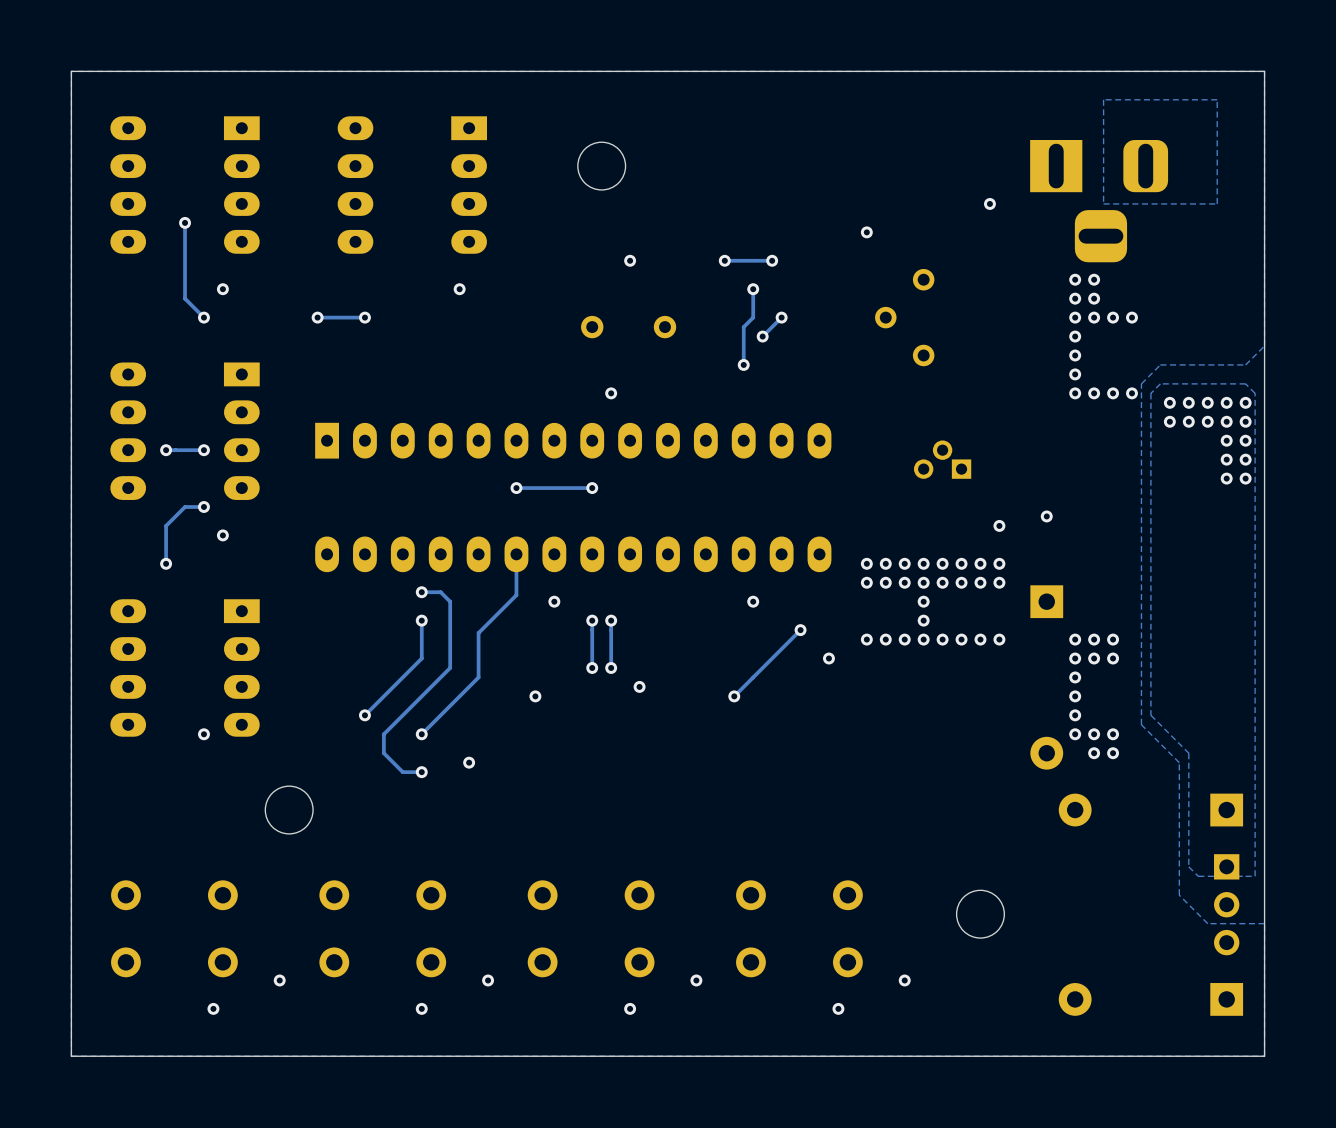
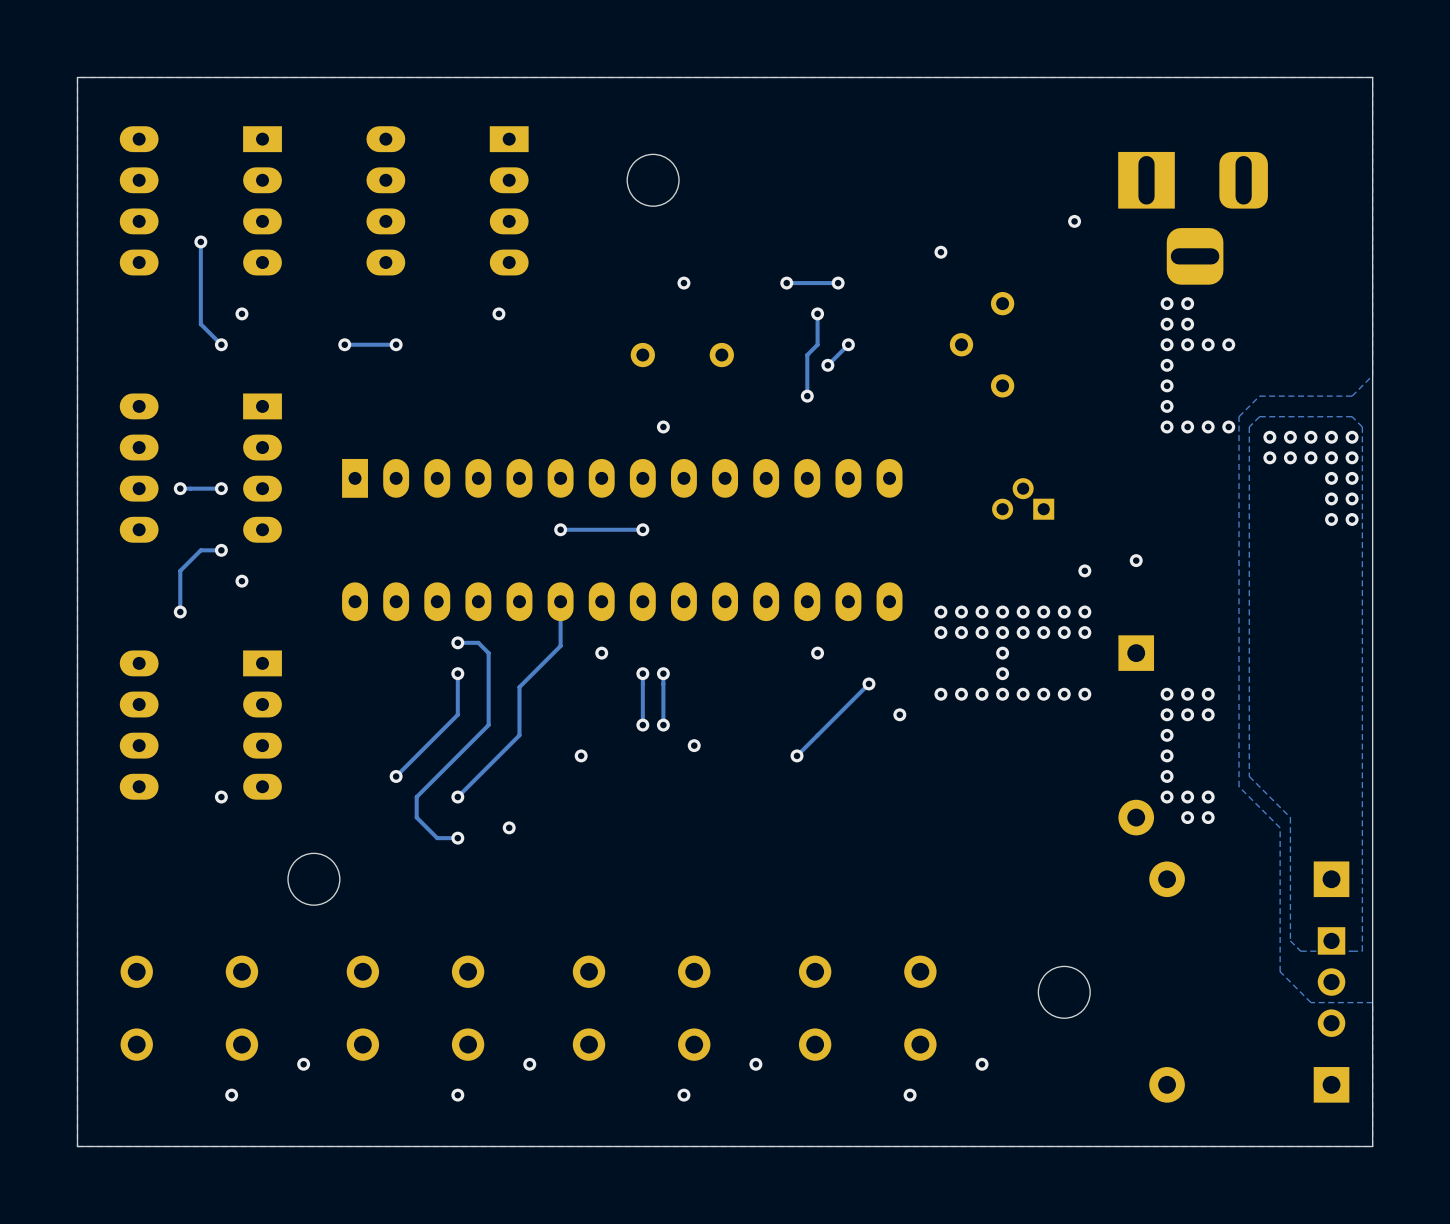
zone outline: (1217, 99) (1217, 203) (1103, 203) (1103, 99) (1217, 99) -> none

